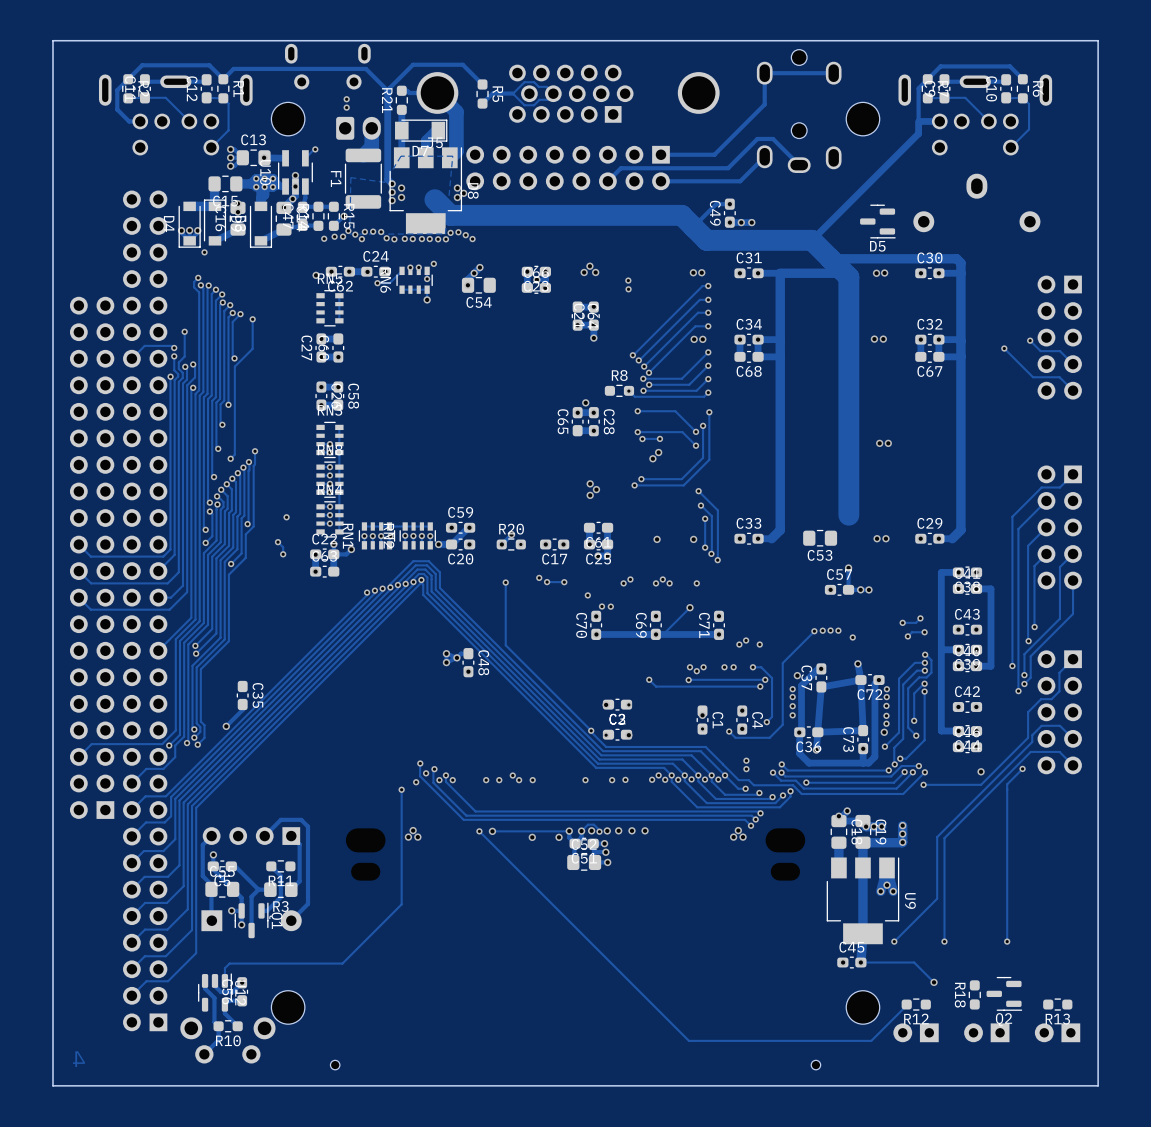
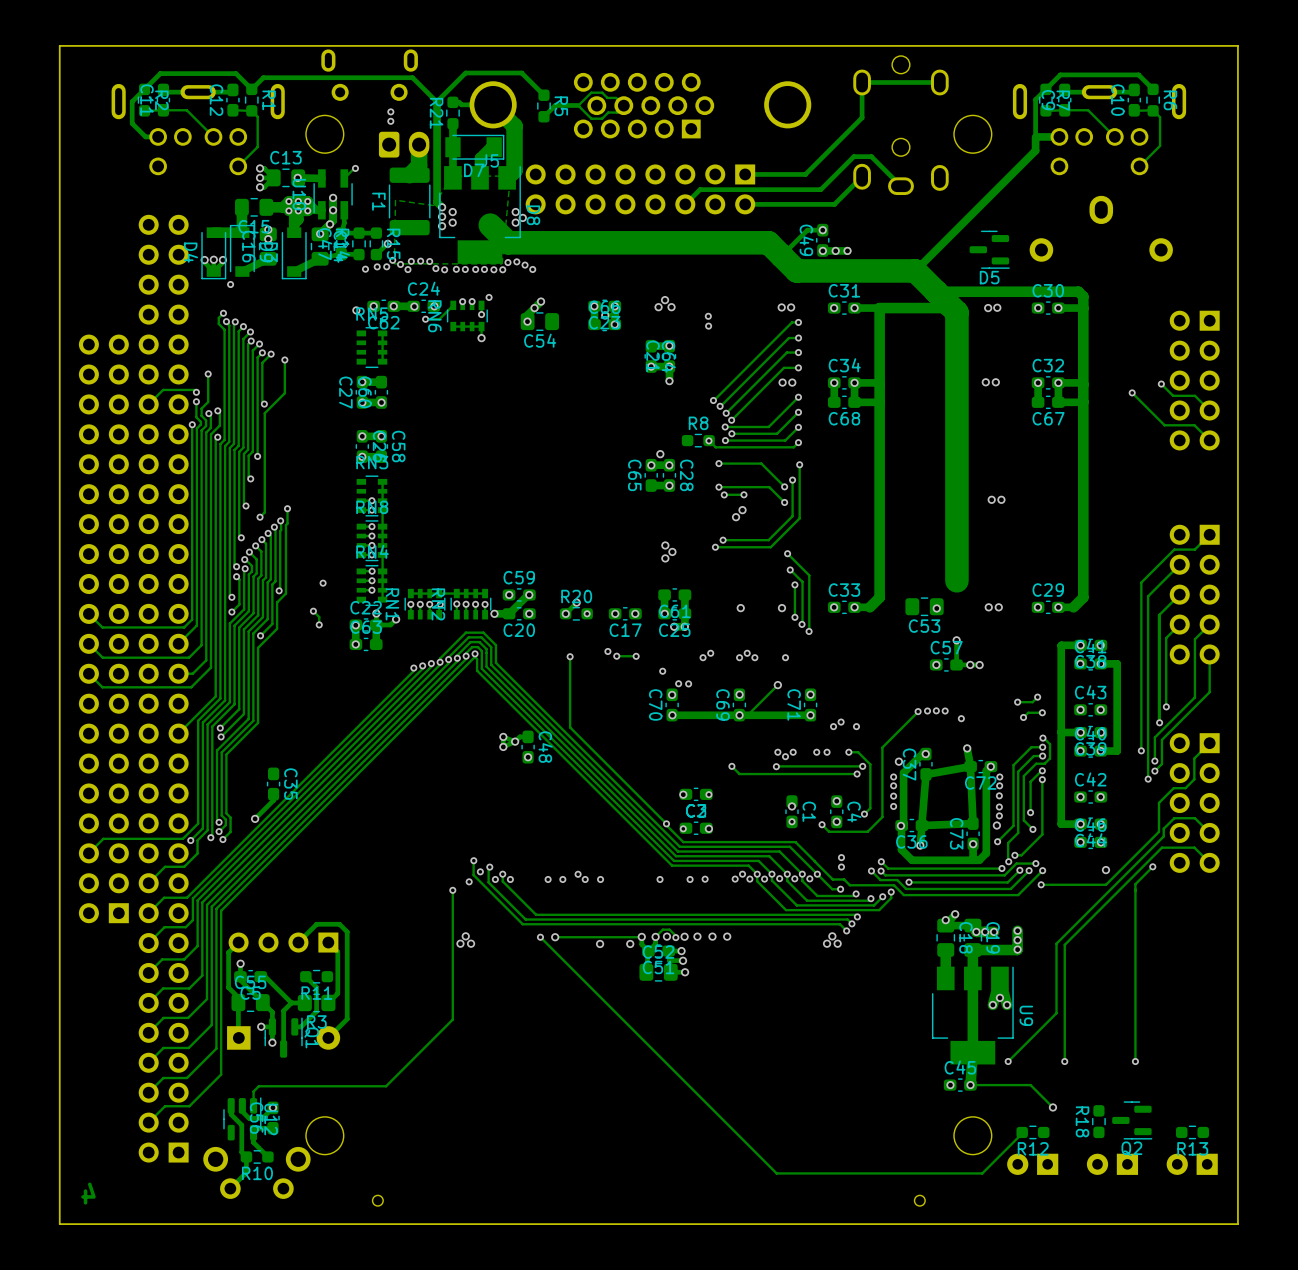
via: none -> (936, 608)

